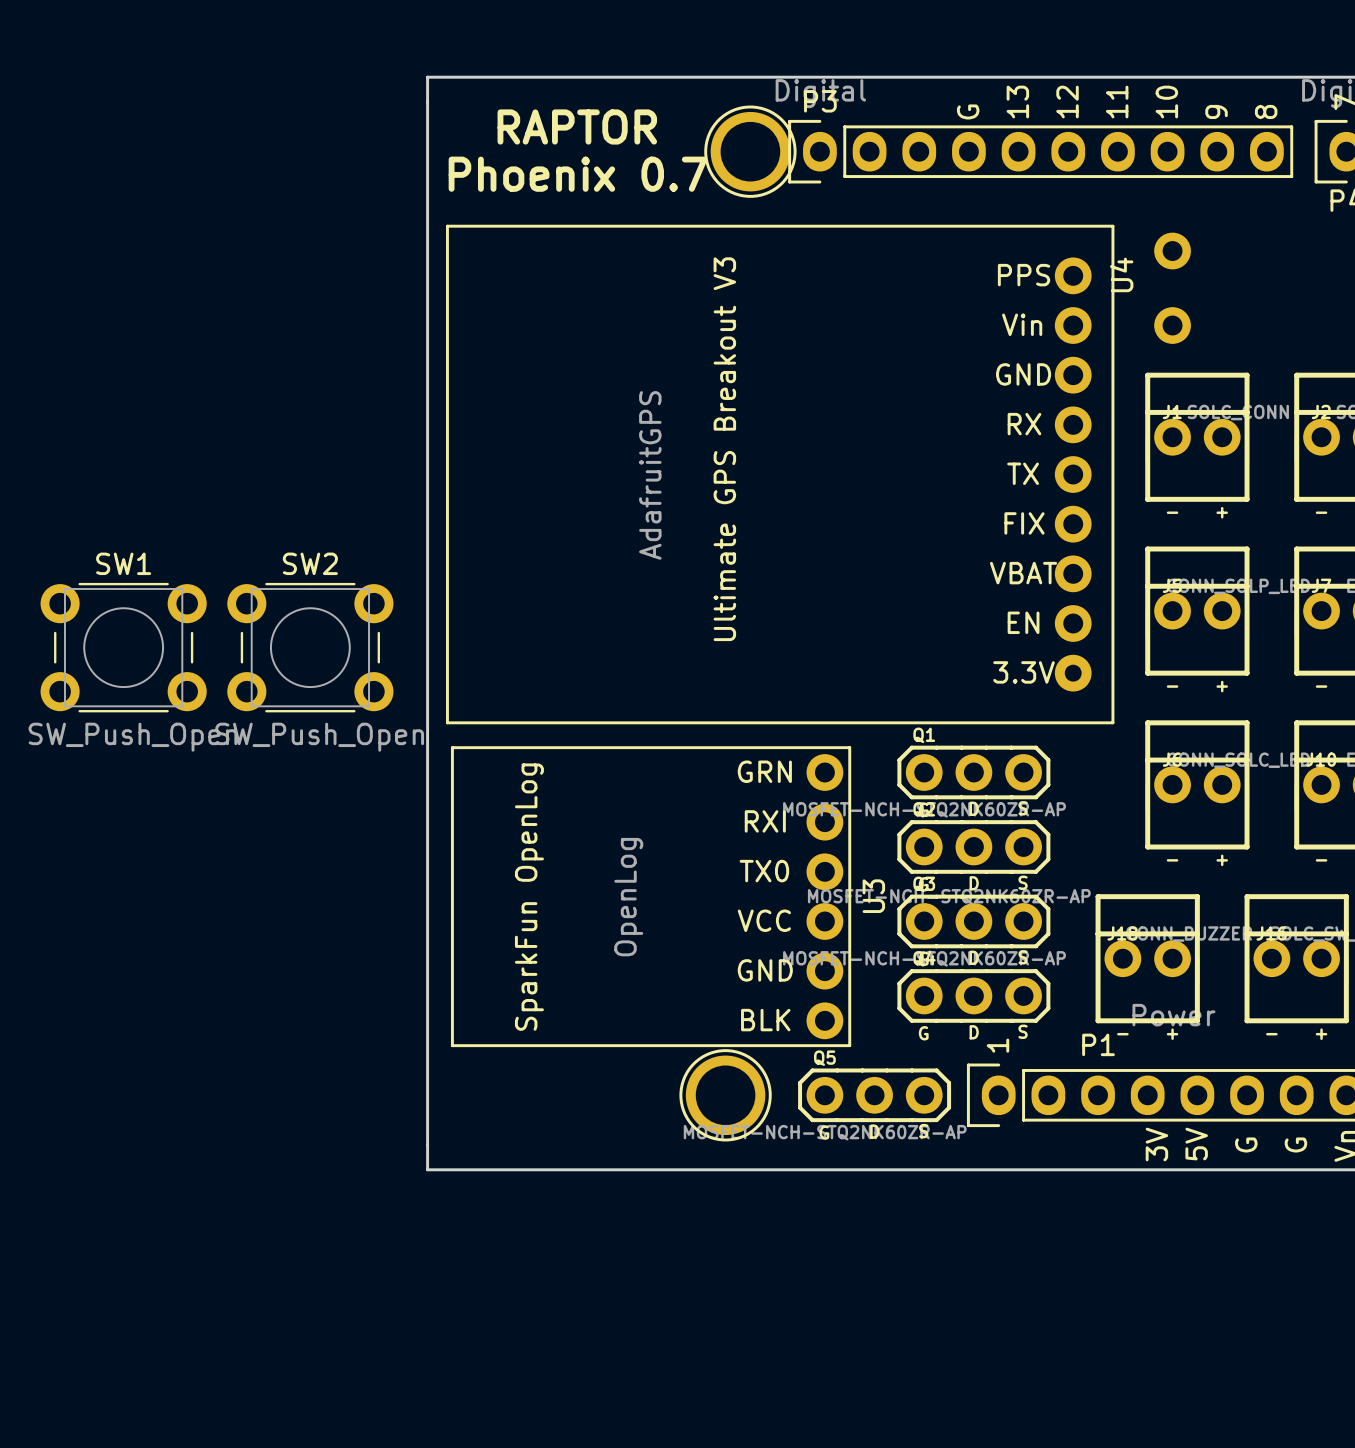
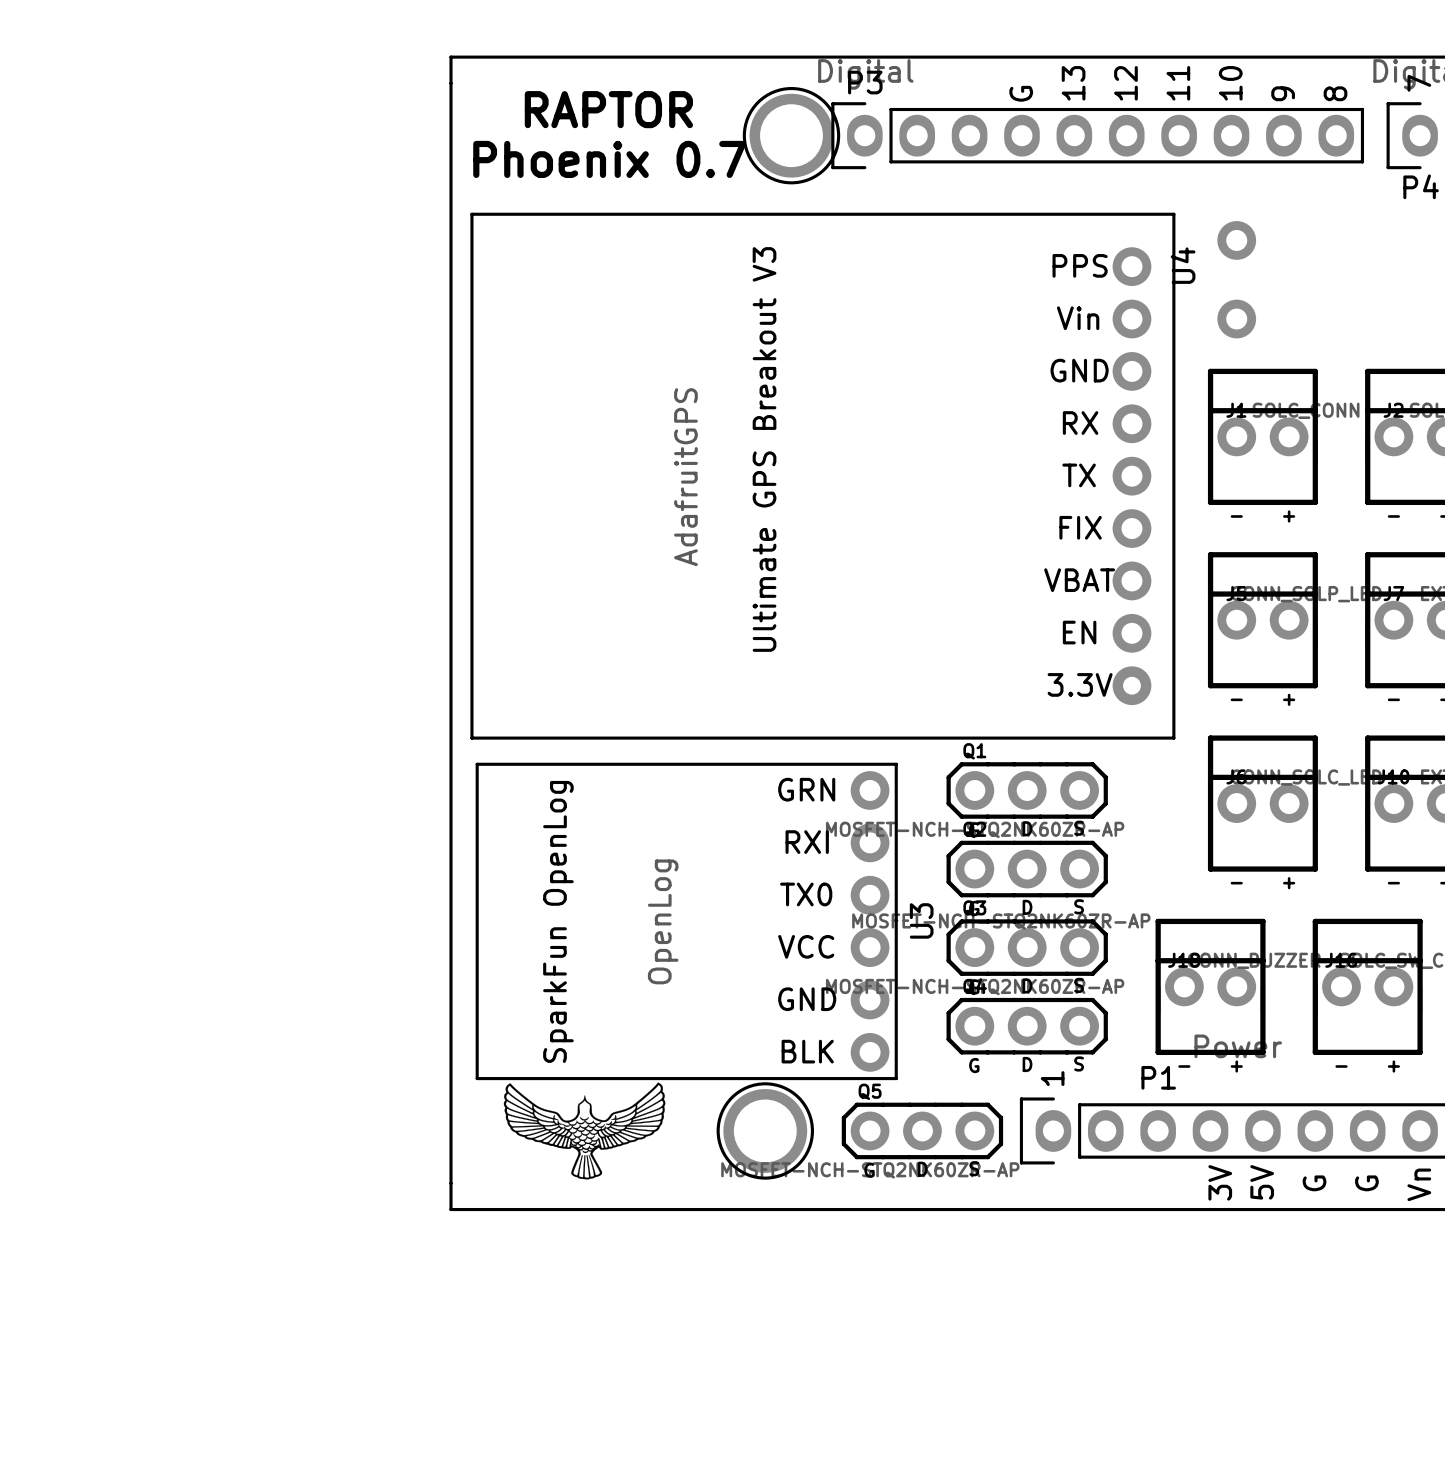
SW1: SW_Push_Open (123, 647) -> none
SW2: SW_Push_Open (310, 647) -> none
drawing: none -> [503, 1082, 666, 1180]

